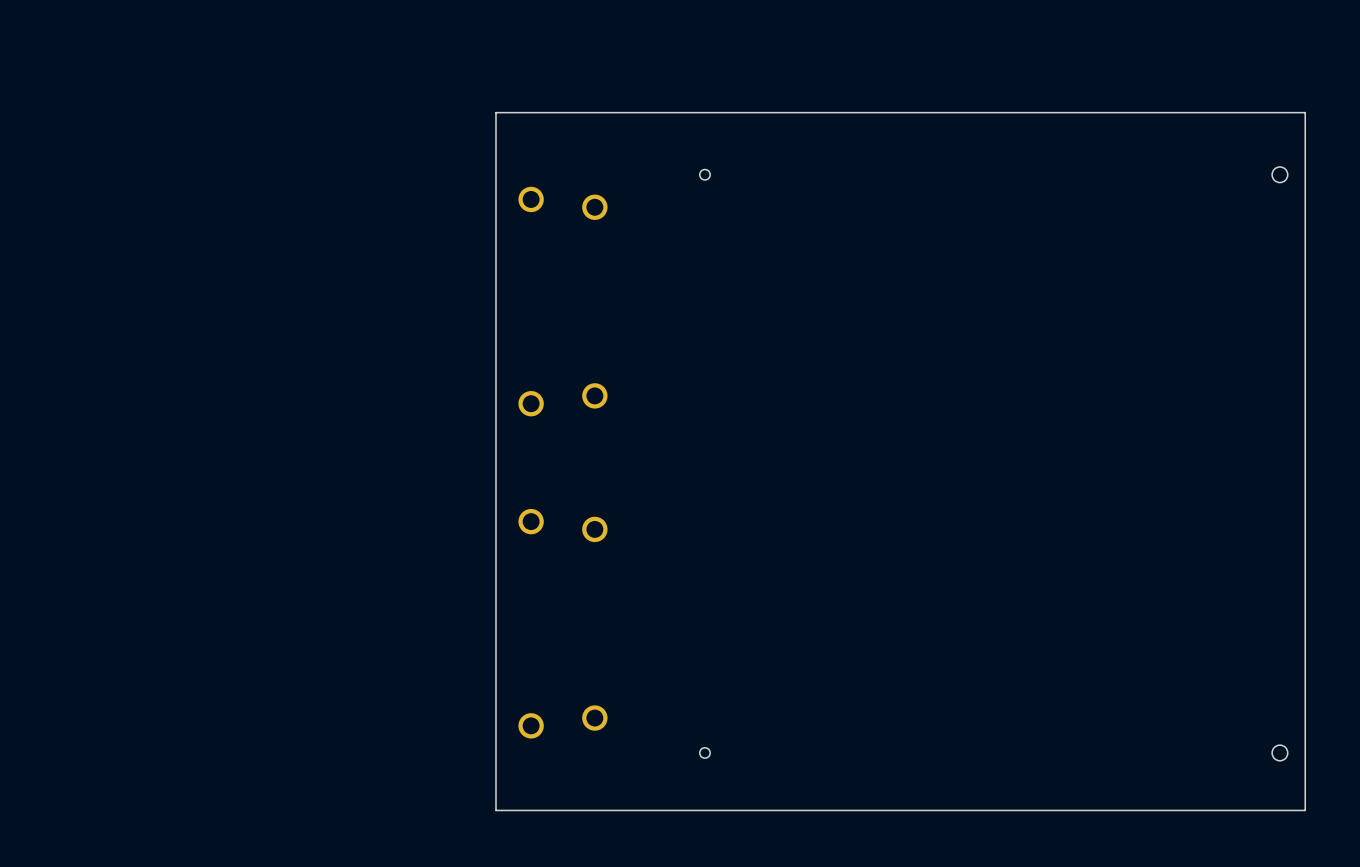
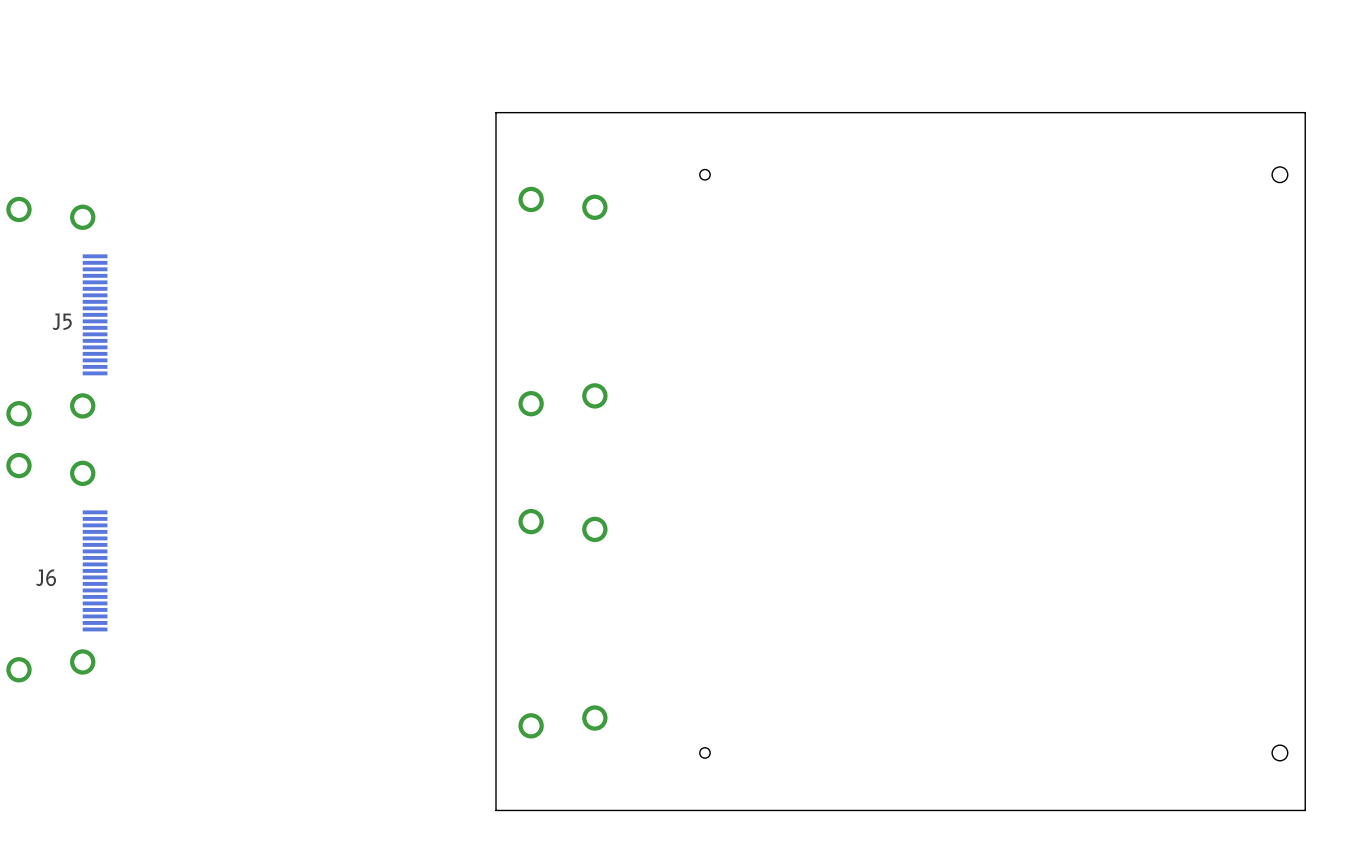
J5: none -> (56, 311)
J6: none -> (56, 567)

